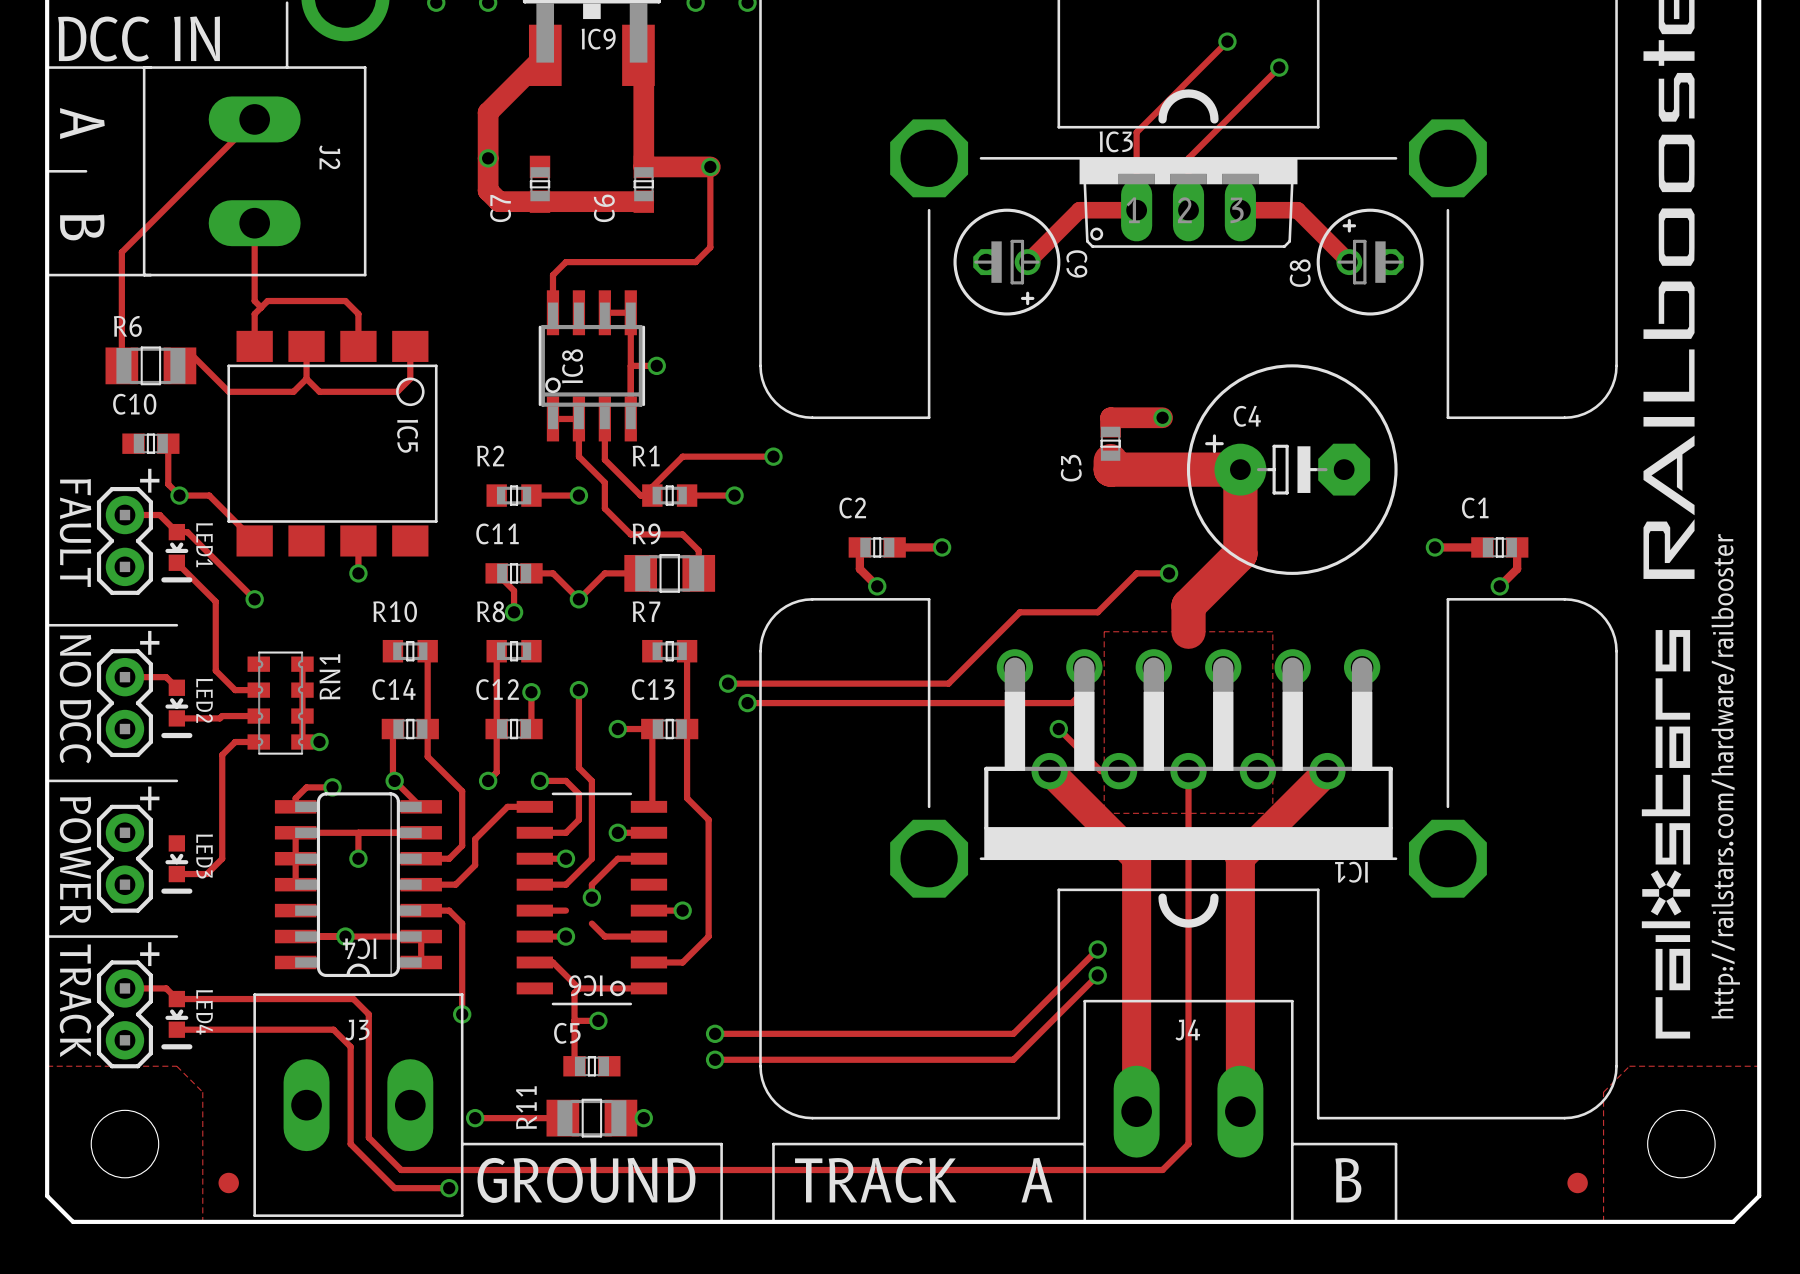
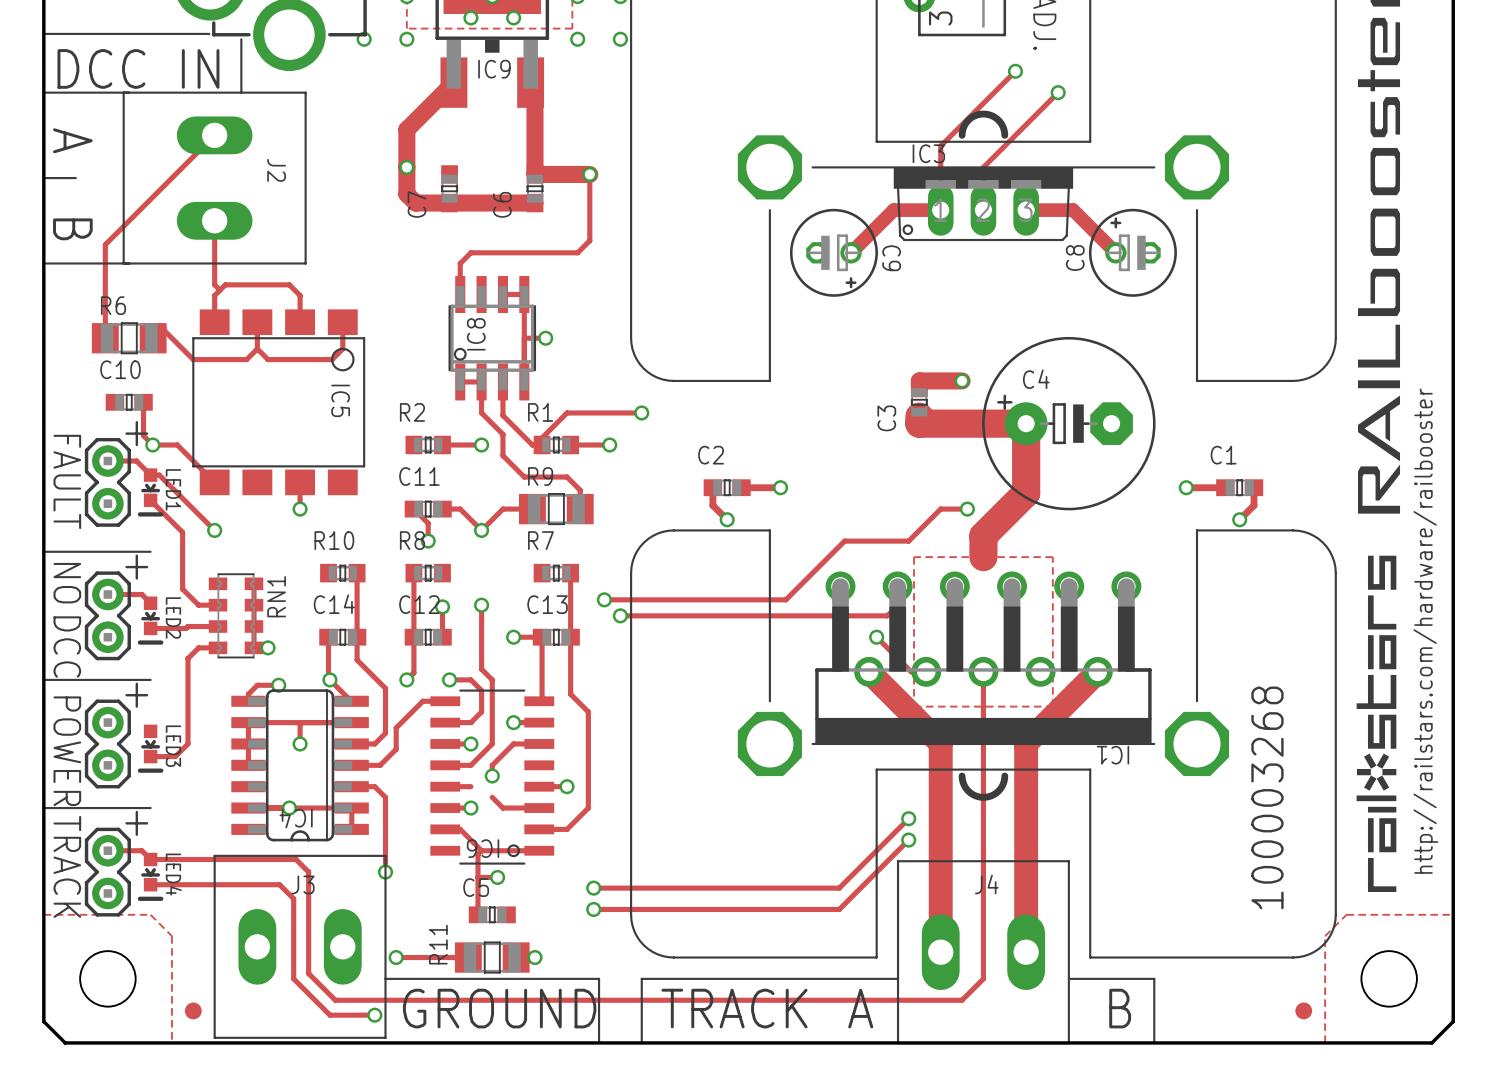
text: none -> 100003268 (1267, 797)

